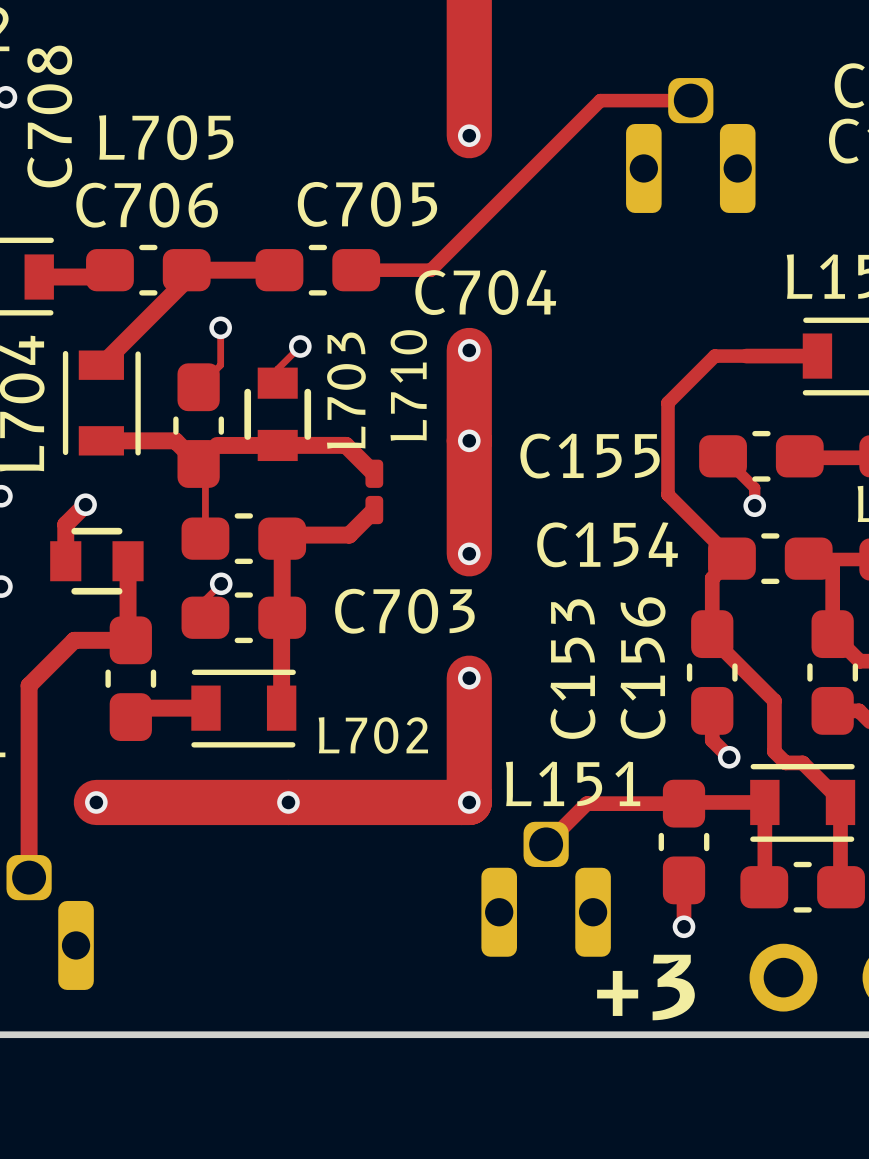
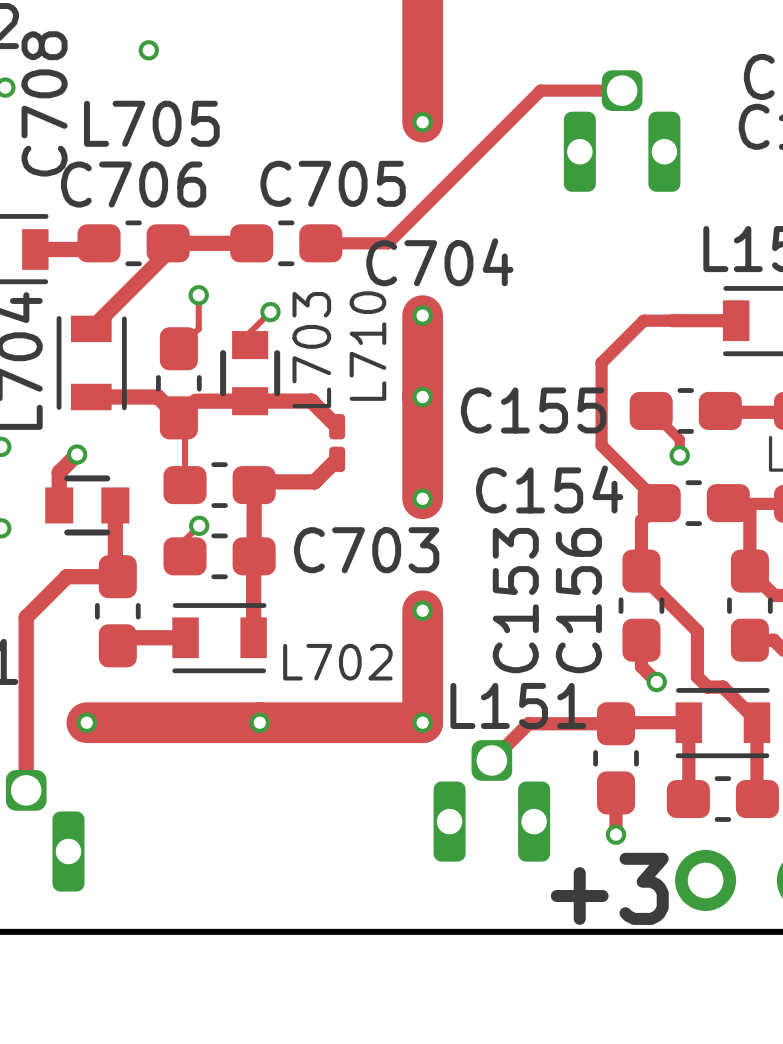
via: none -> (148, 50)

